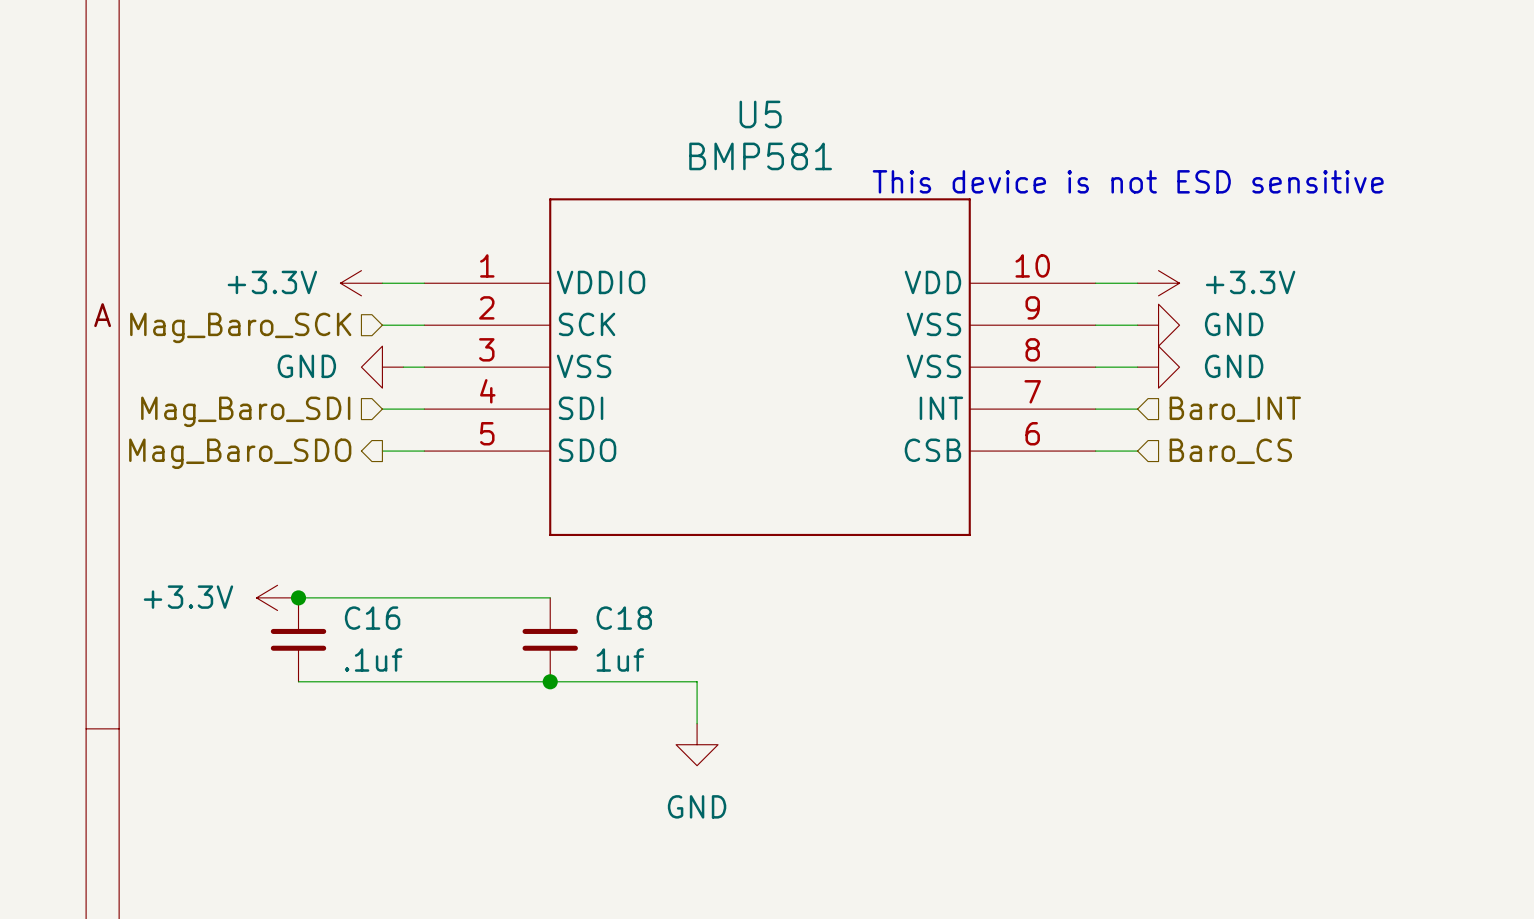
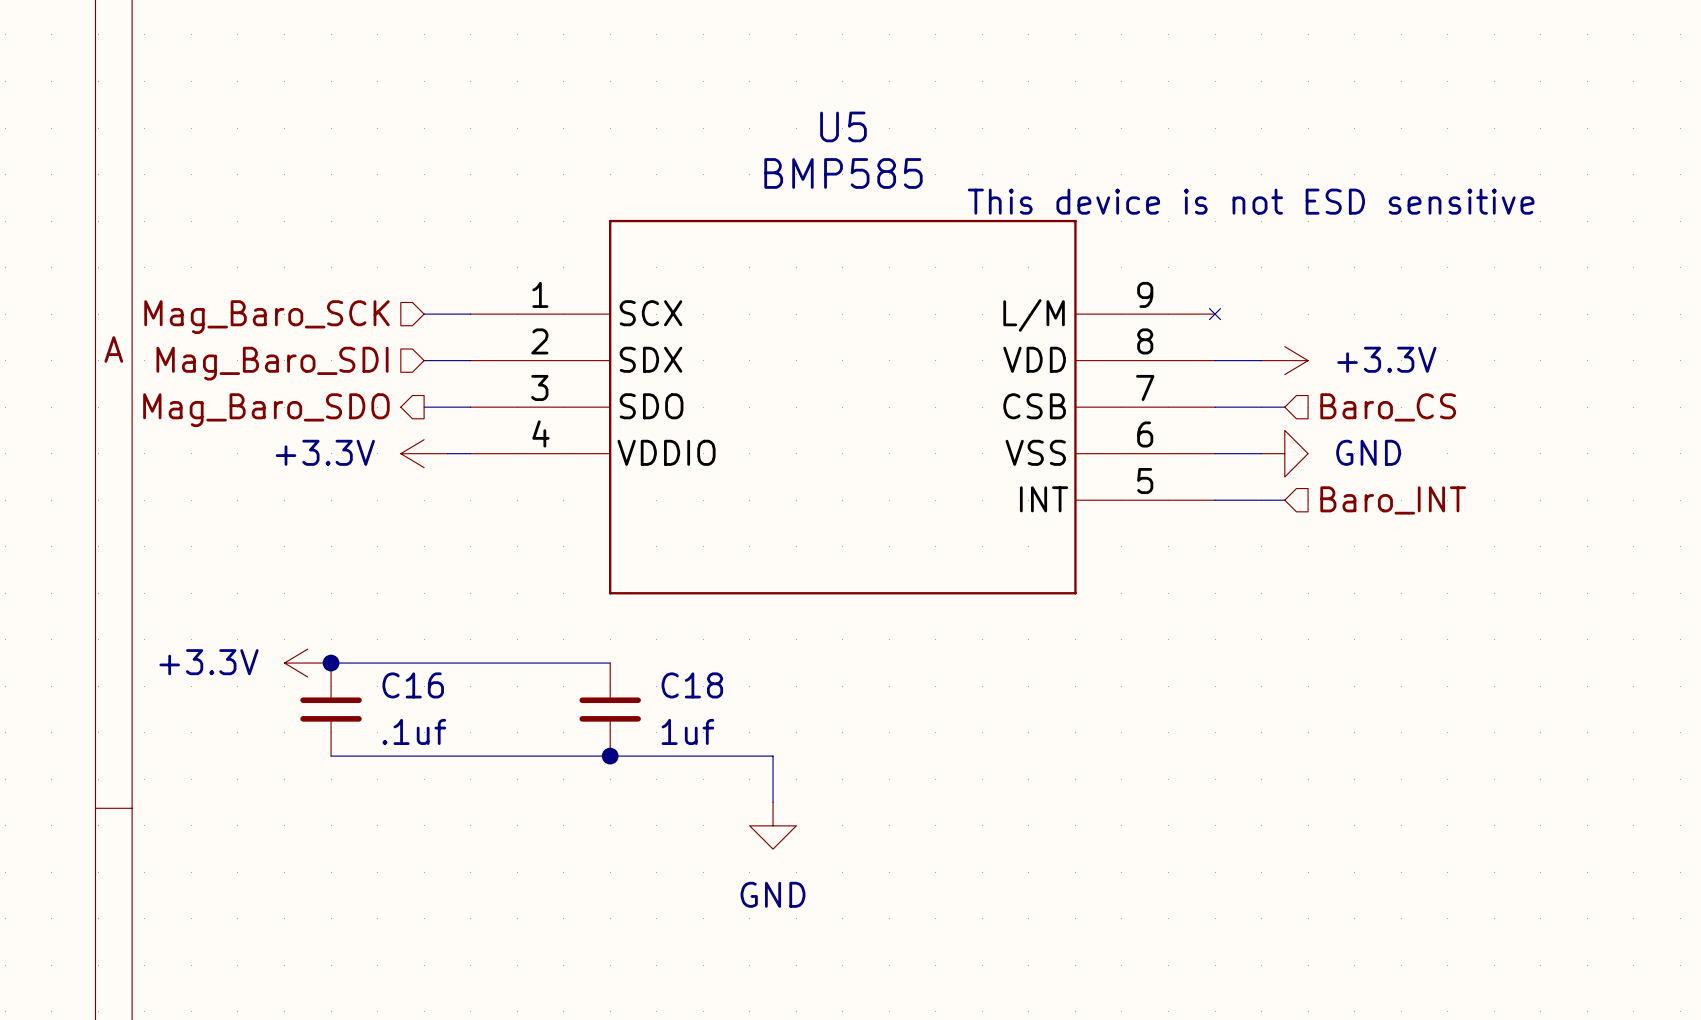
U5 value: BMP581 (760, 156) -> BMP585 (843, 173)
U5 symbol: [424, 198, 1096, 537] -> [470, 219, 1221, 595]
power symbol position: +3.3V (361, 283) -> +3.3V (424, 453)
wire: (1095, 283) (1137, 283) -> none
power symbol: +3.3V (1158, 283) -> none
hierarchical label: none -> Mag_Baro_SCK (266, 317)
power symbol: GND (1158, 325) -> +3.3V (1284, 360)
hierarchical label: Mag_Baro_SCK (240, 327) -> Mag_Baro_SDI (272, 363)
power symbol: GND (382, 367) -> none
power symbol position: GND (1158, 367) -> GND (1284, 453)
hierarchical label position: Baro_INT (1235, 409) -> Baro_INT (1393, 500)
hierarchical label: Mag_Baro_SDI (245, 411) -> none
wire: (382, 451) (424, 451) -> none
wire: none -> (1261, 500) (1284, 500)
hierarchical label position: Baro_CS (1230, 451) -> Baro_CS (1388, 407)
hierarchical label position: Mag_Baro_SDO (240, 453) -> Mag_Baro_SDO (266, 410)

